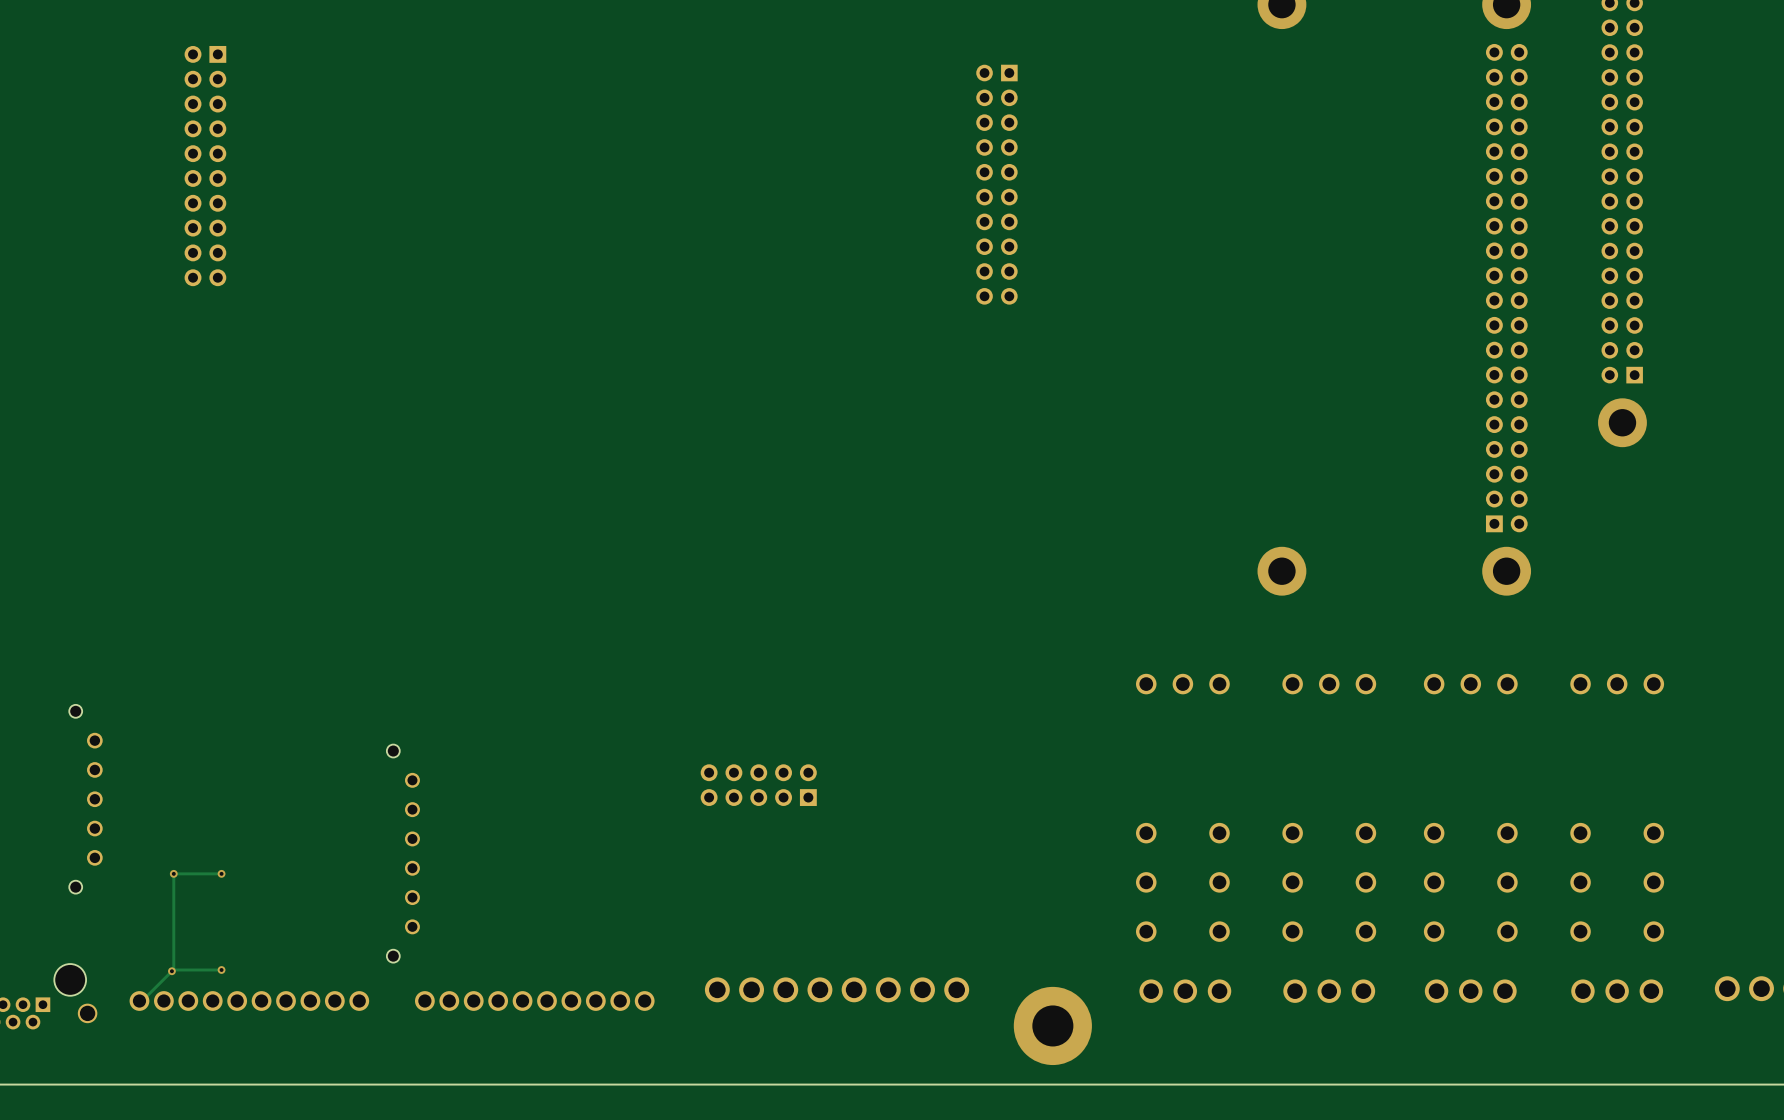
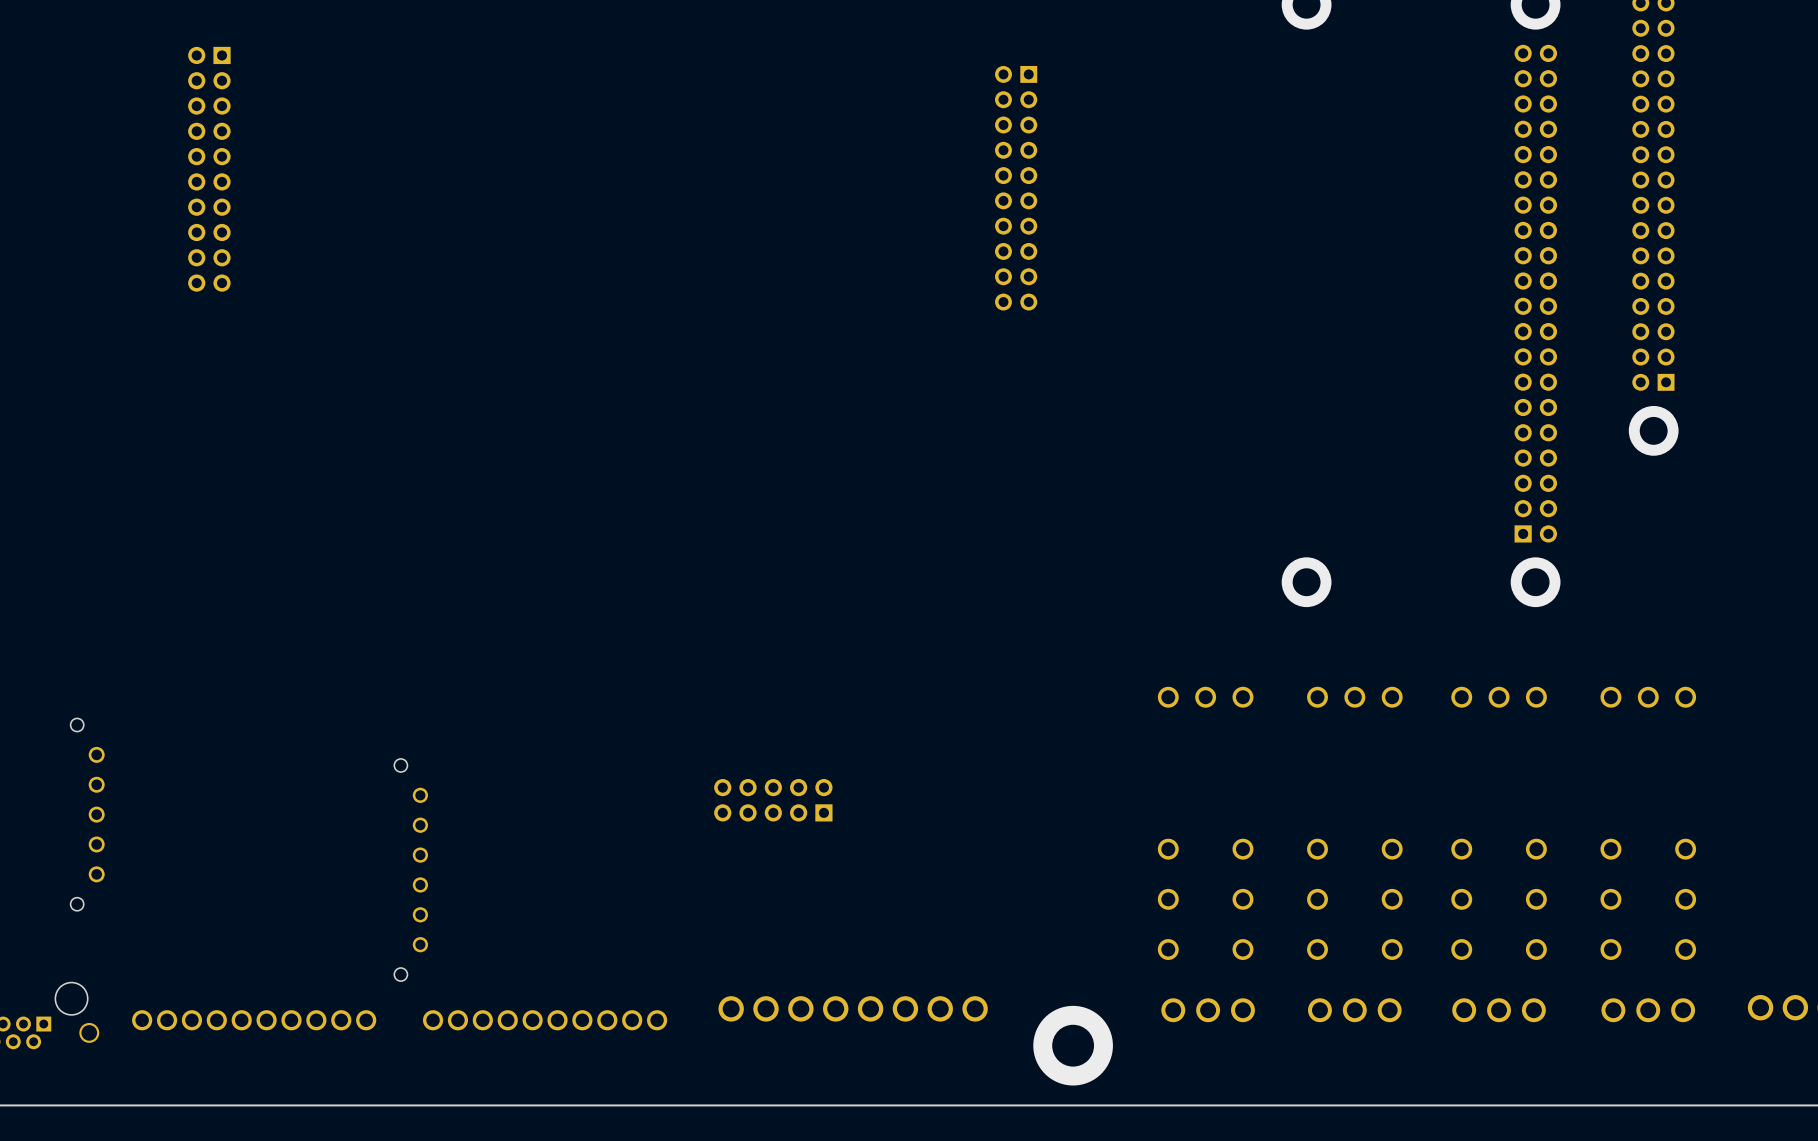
via: (173, 873) -> none
track: (221, 873) (173, 873) (173, 969) (142, 1001) (139, 1001) -> none
via: (221, 873) -> none
track: (221, 969) (173, 969) -> none
via: (221, 969) -> none
via: (171, 971) -> none

